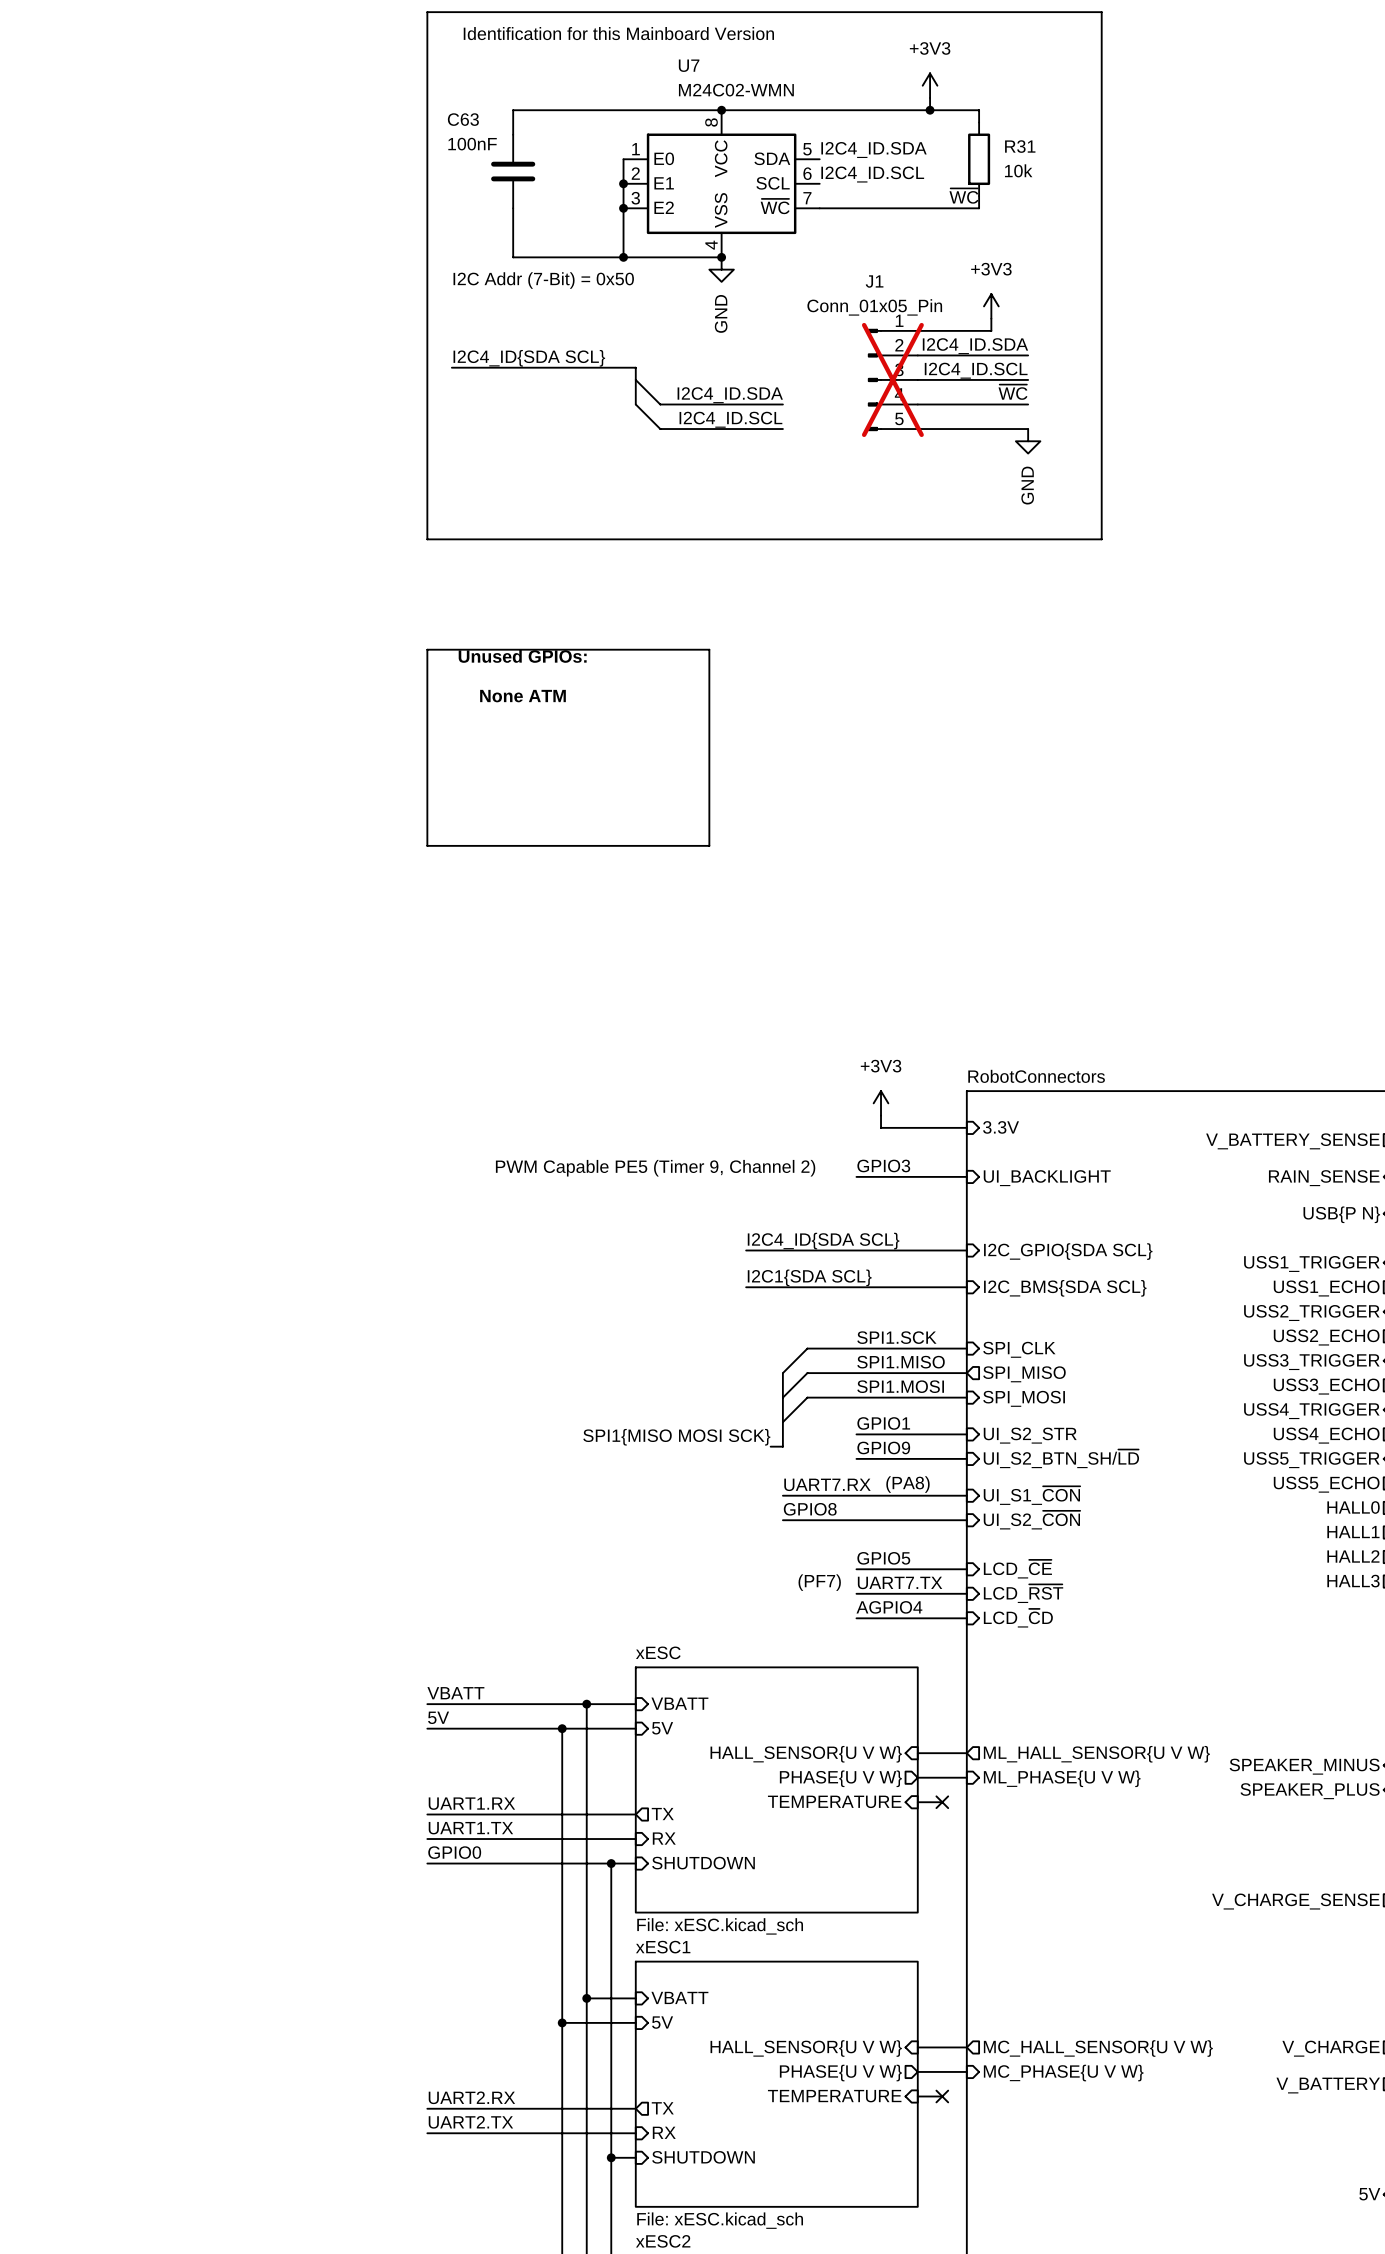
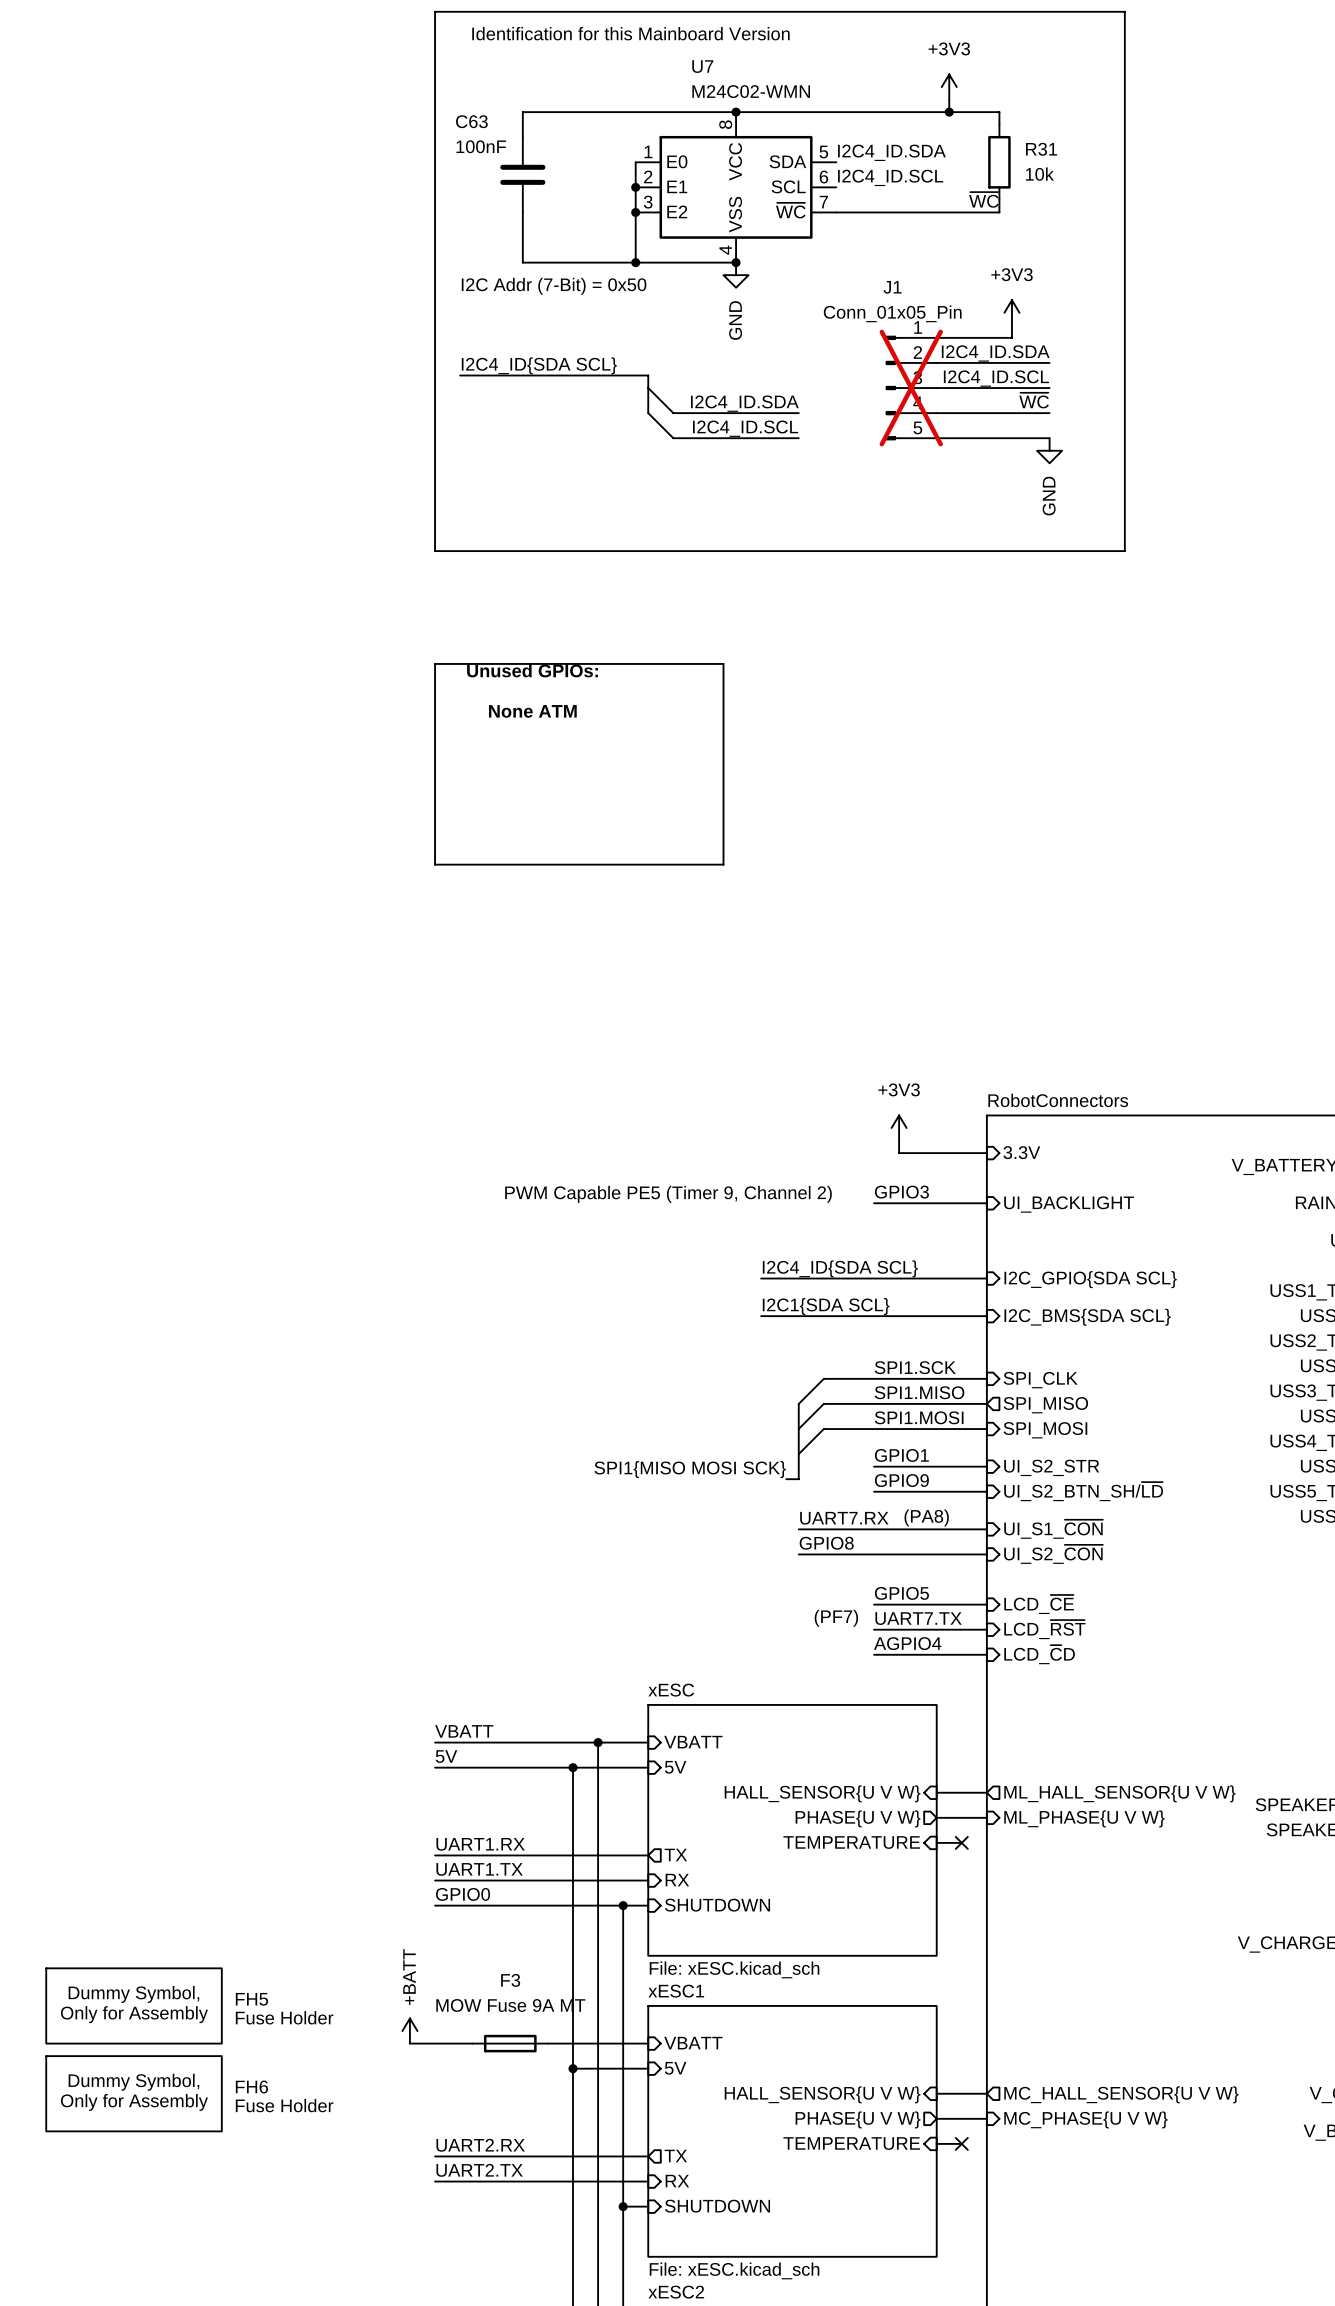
FH5: none -> Fuse Holder (134, 2005)
power symbol: none -> +BATT (409, 2031)
wire: none -> (409, 2043) (472, 2043)
F3: none -> MOW Fuse 9A MT (510, 2043)
wire: none -> (547, 2043) (598, 2043)
junction: (586, 1998) -> none
FH6: none -> Fuse Holder (134, 2093)

